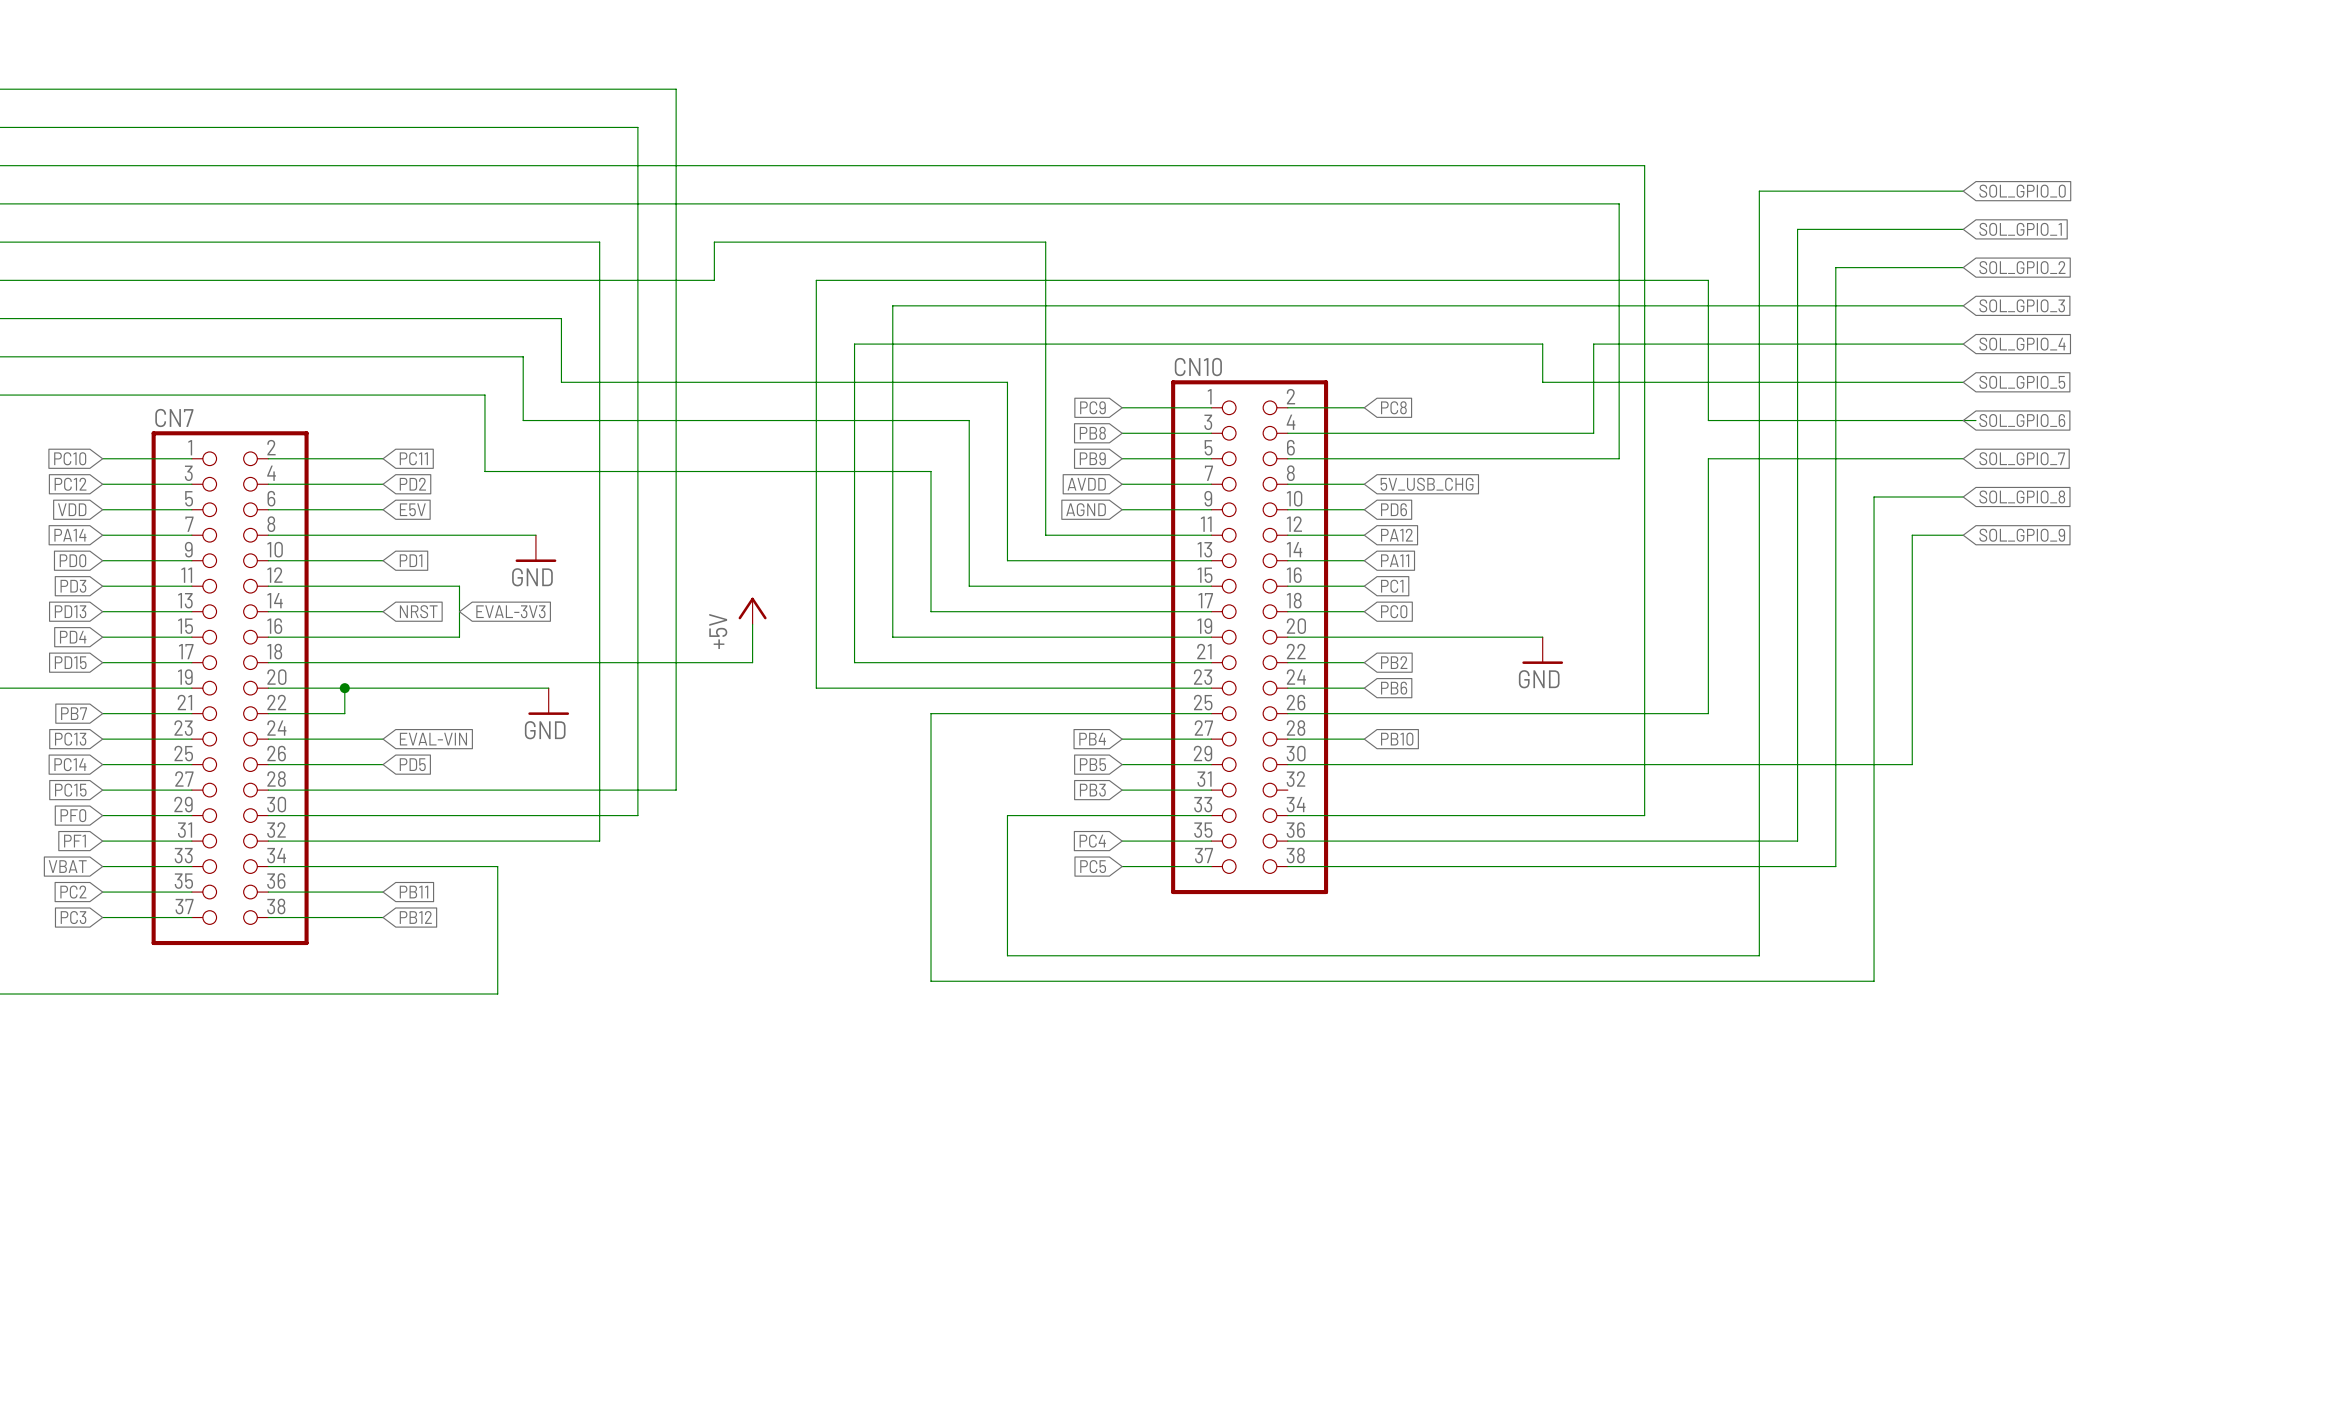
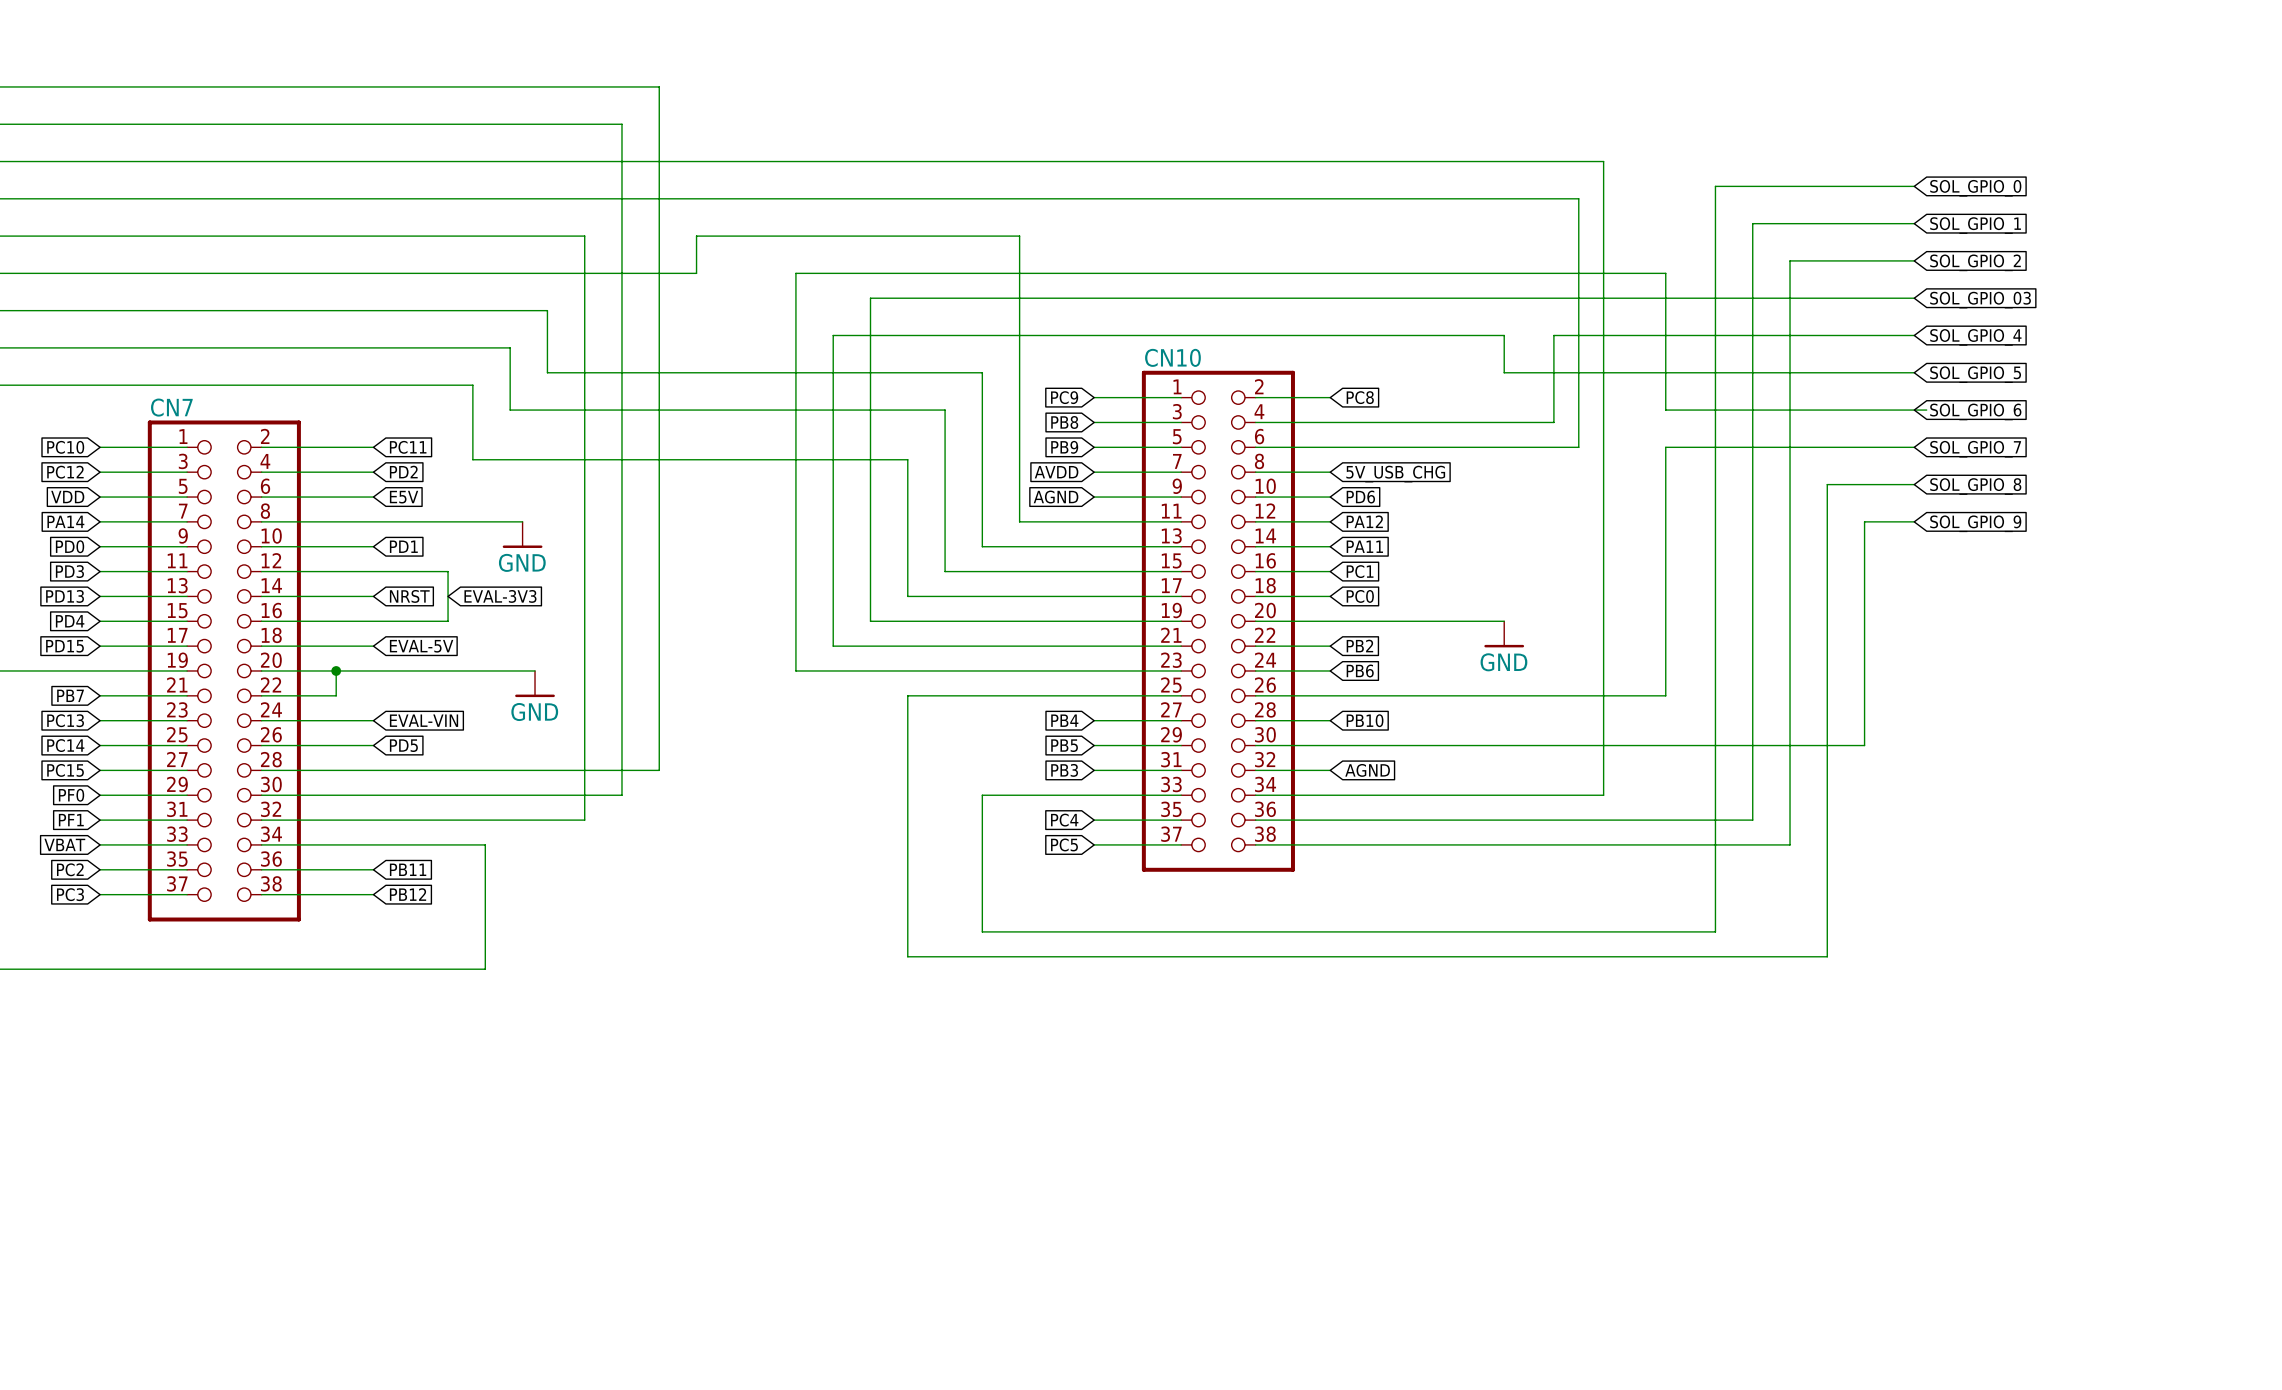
global label: SOL_GPIO_3 (2022, 305) -> SOL_GPIO_03 (1980, 300)
power symbol: +5V (752, 611) -> none
wire: (752, 624) (752, 662) (383, 662) -> none
global label: none -> EVAL-5V (421, 646)
wire: none -> (1255, 770) (1330, 770)
global label: none -> AGND (1367, 770)

